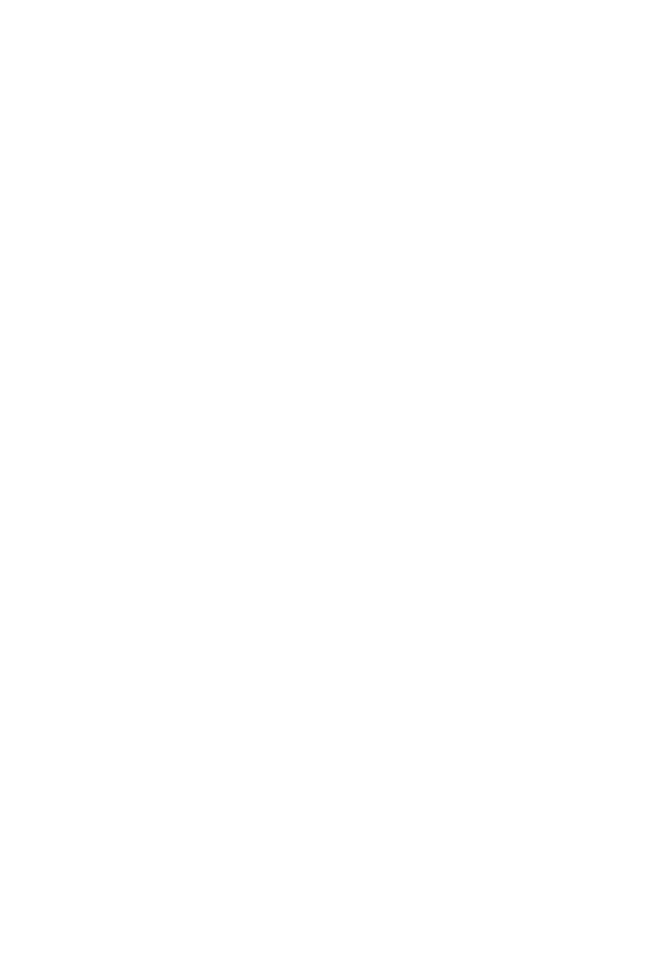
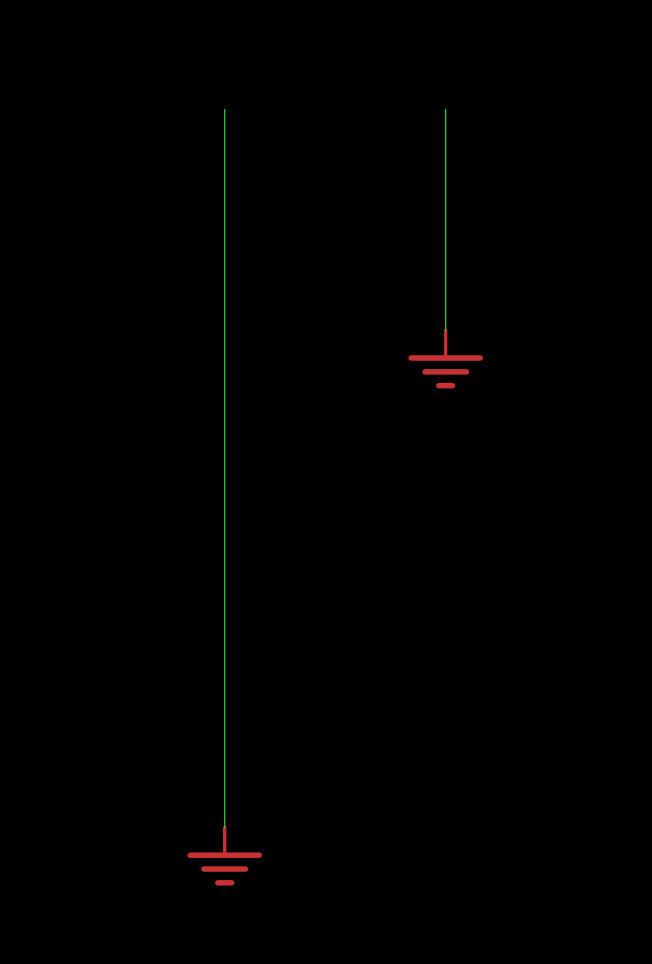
wire: none -> (224, 109) (224, 827)
wire: none -> (445, 109) (445, 330)
power symbol: none -> (445, 358)
power symbol: none -> (224, 855)

